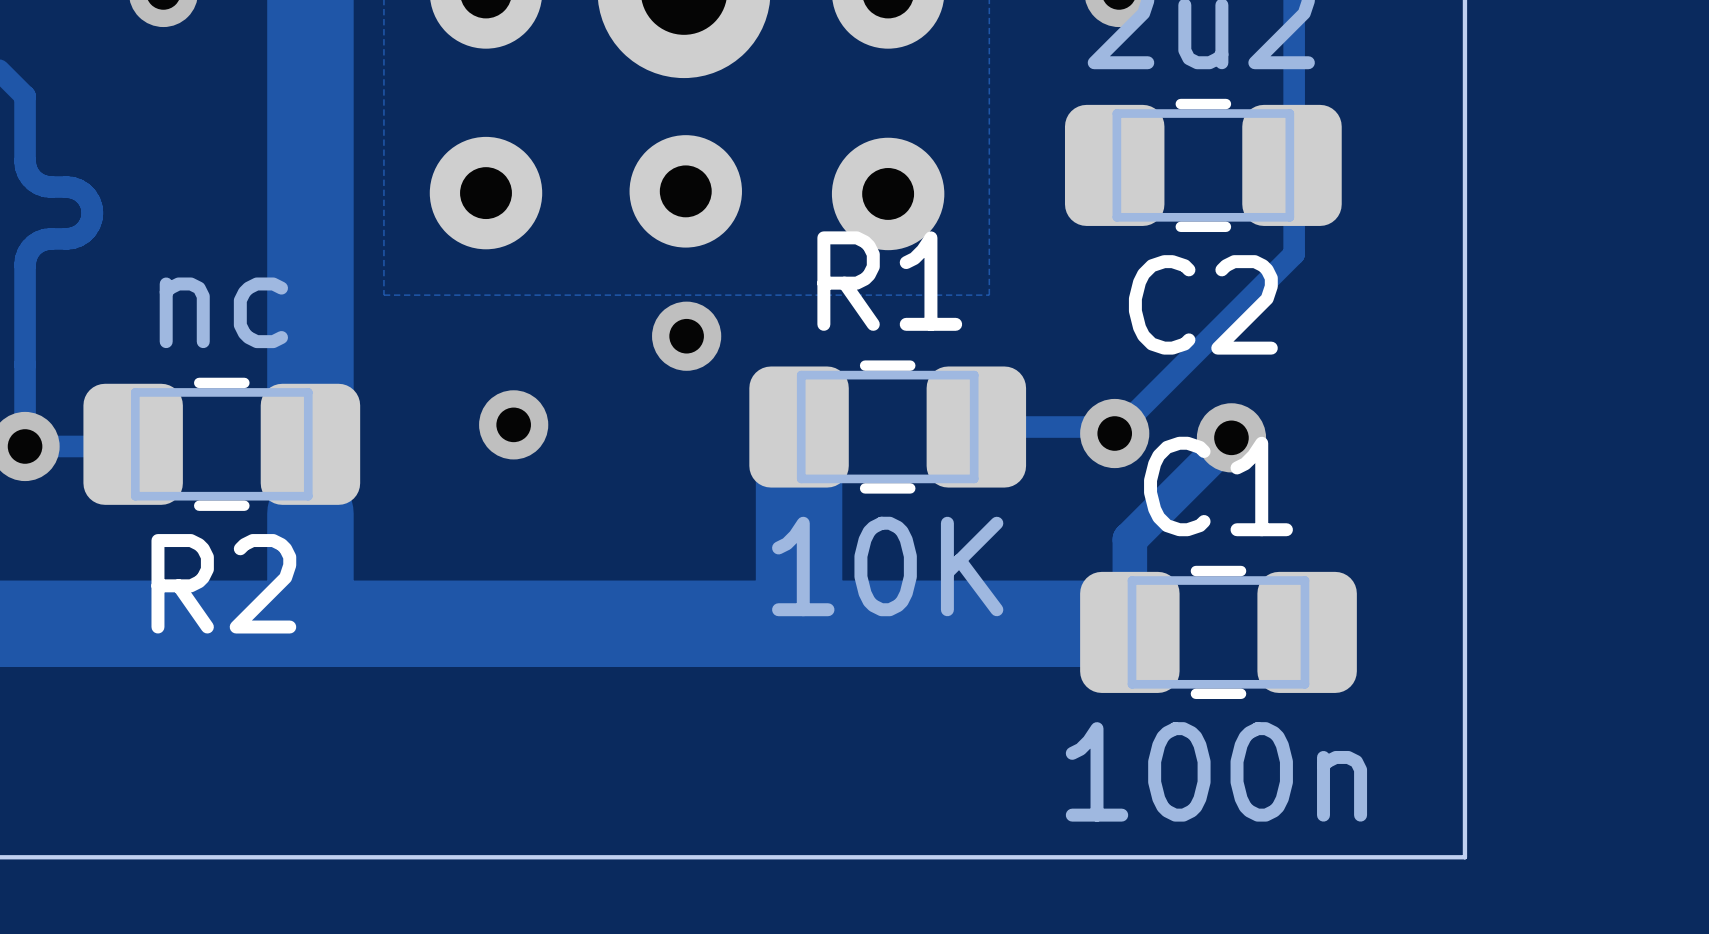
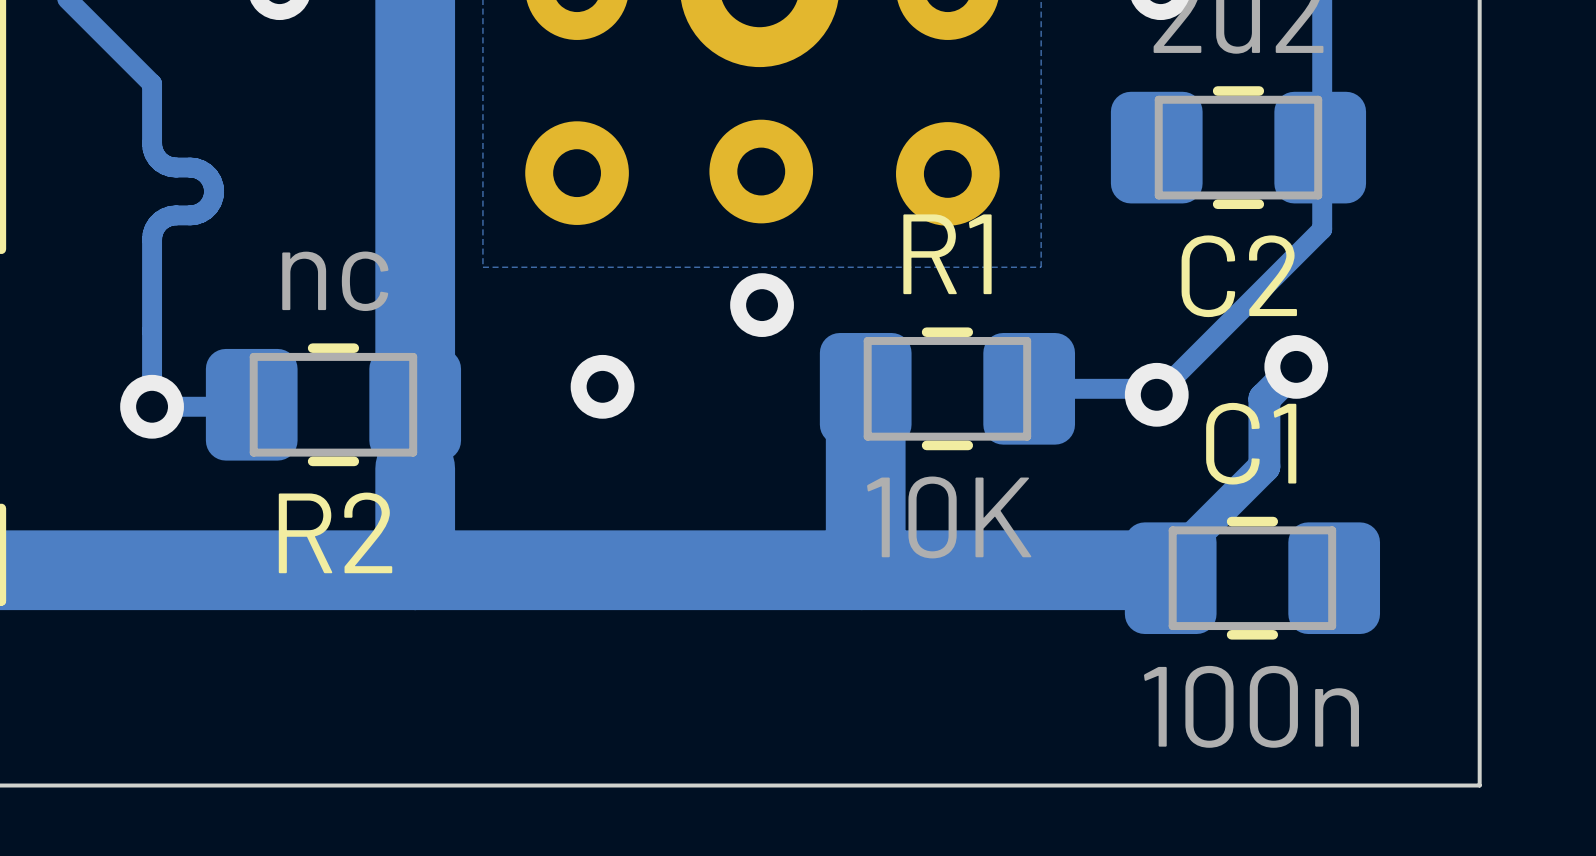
track: (1231, 437) (1129, 539) (1129, 612) -> (1296, 366) (1264, 398) (1264, 466) (1170, 560)
via position: (1231, 437) -> (1296, 366)

